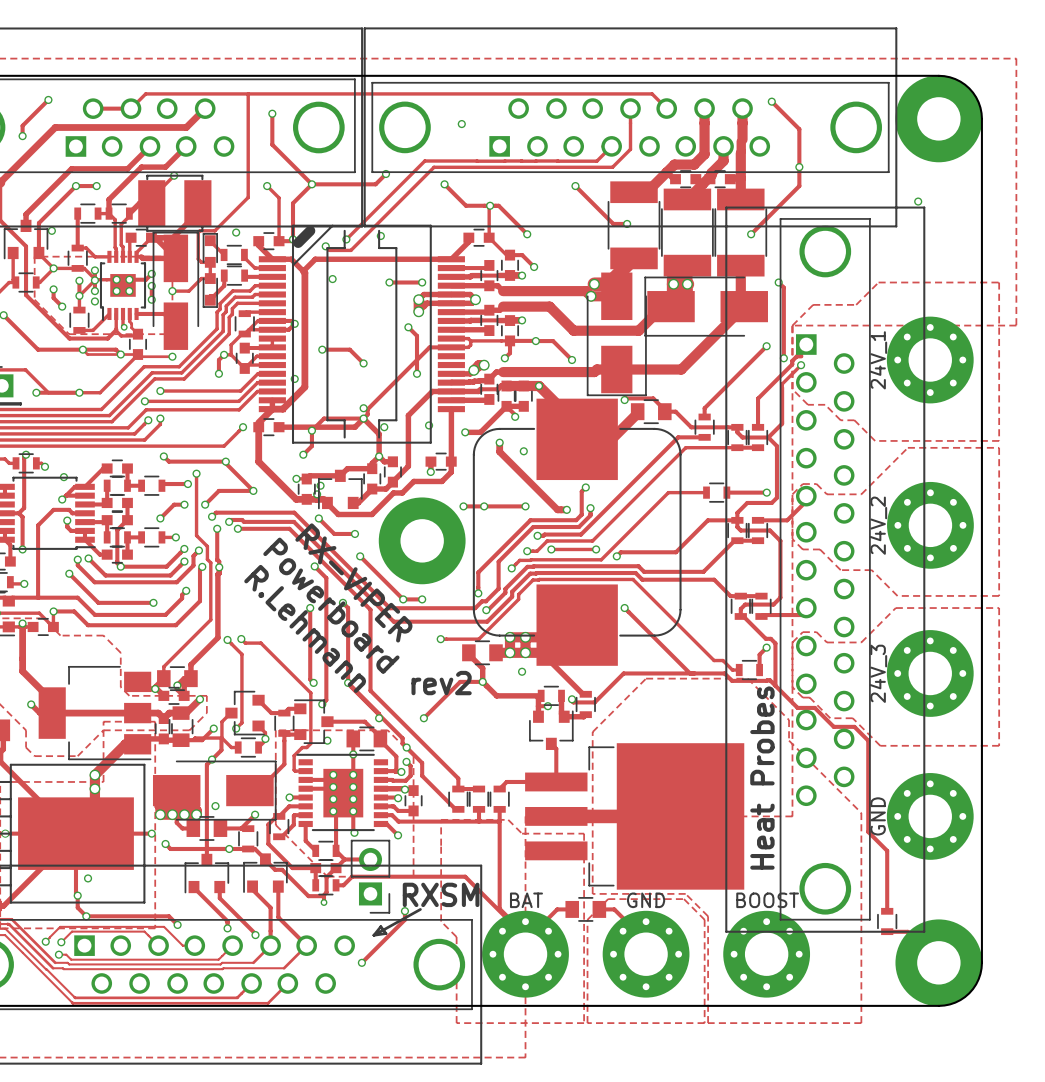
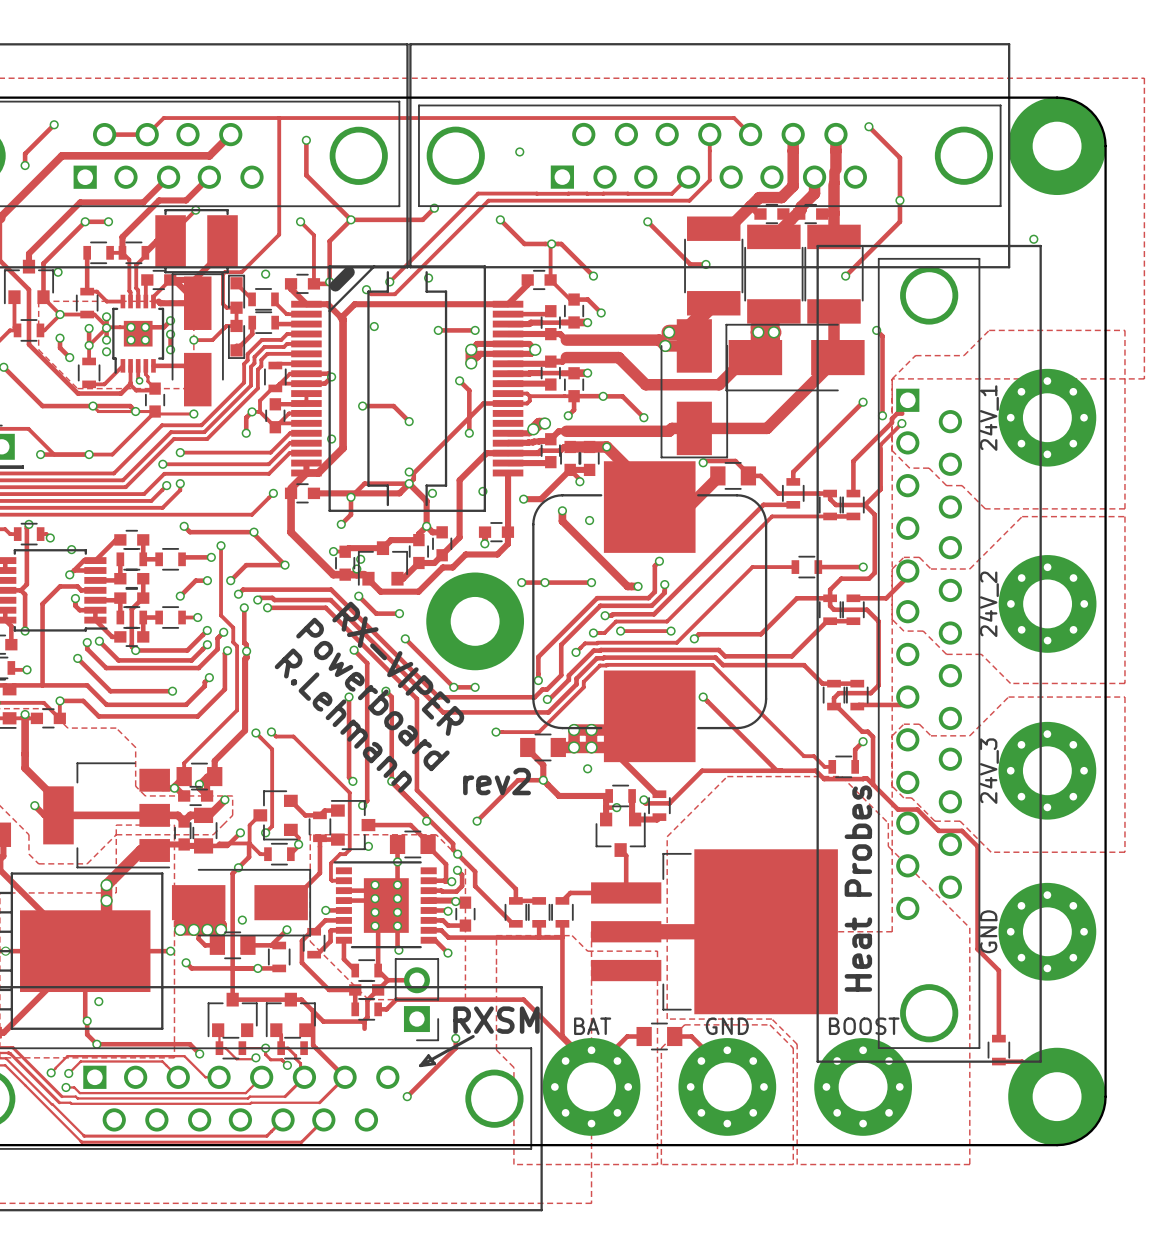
track: (248, 848) (254, 848) (275, 869) (282, 869) (308, 896) -> (232, 980) (232, 999) (301, 999) (323, 1021) (347, 1021)
part position: (206, 873) -> (232, 1015)
part position: (265, 873) -> (290, 1015)
track: (252, 886) (252, 889) (270, 907) (270, 945) -> none
track: (194, 887) (227, 921) (227, 928) -> none
track: (219, 887) (219, 898) (255, 935) -> (242, 1048) (265, 1048) (265, 1054) (270, 1059) (281, 1059) (287, 1065)
via: (324, 902) -> none
track: none -> (218, 1030) (219, 1048) (225, 1048) (236, 1059) (254, 1059)
track: none -> (276, 1030) (281, 1035) (281, 1048) (288, 1048) (300, 1063) (300, 1073)
part: none -> (230, 1048)
via: none -> (265, 1048)
part: none -> (292, 1048)

